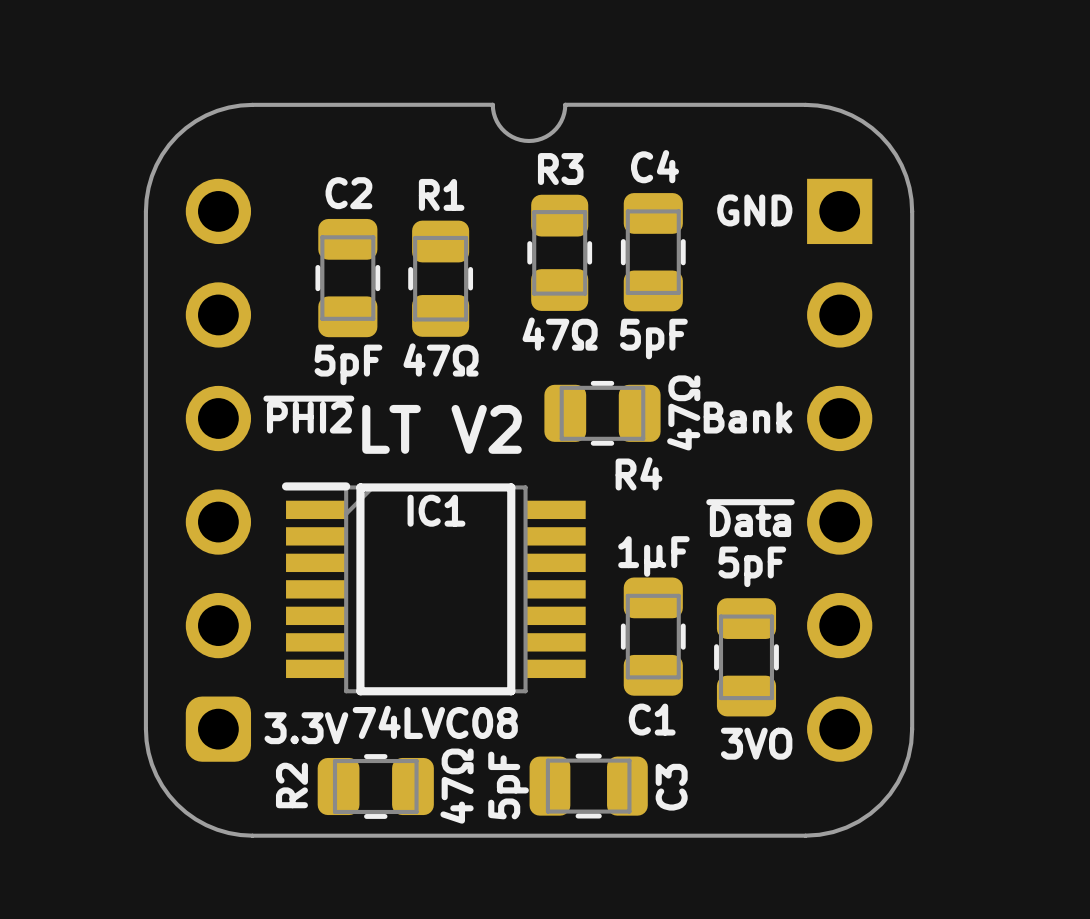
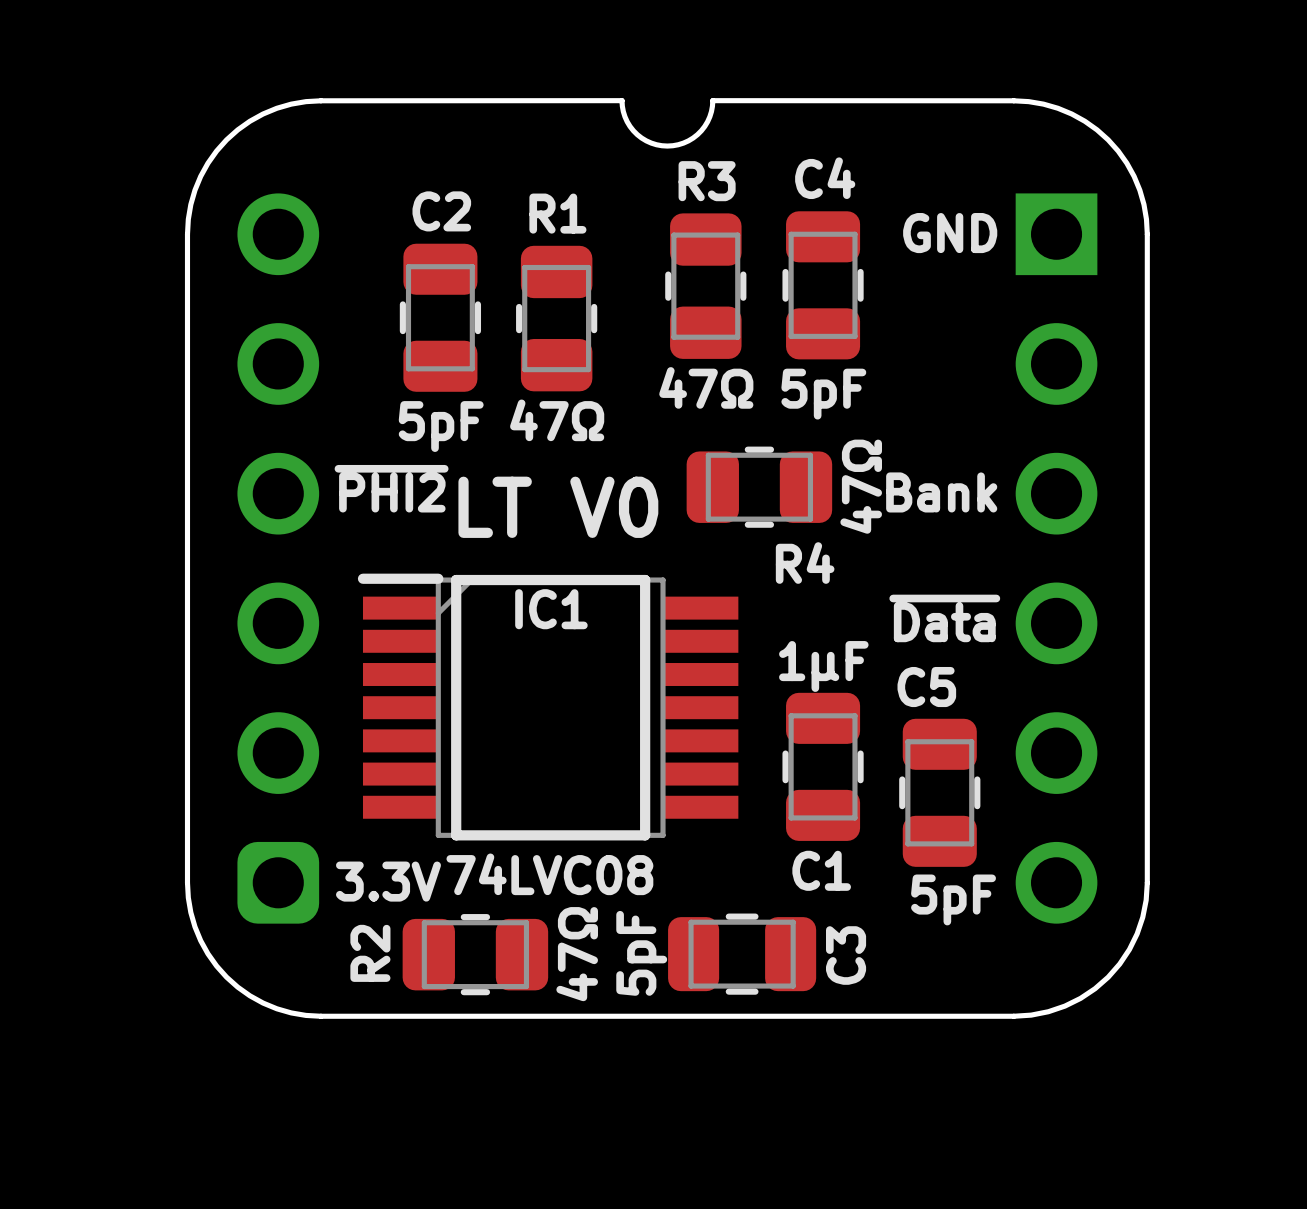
text: LT V2 (442, 429) -> LT V0 (558, 507)
C5 value position: 5pF (752, 566) -> 5pF (953, 899)
C5 name: none -> C5 (926, 687)
text: 3VO (756, 743) -> none

